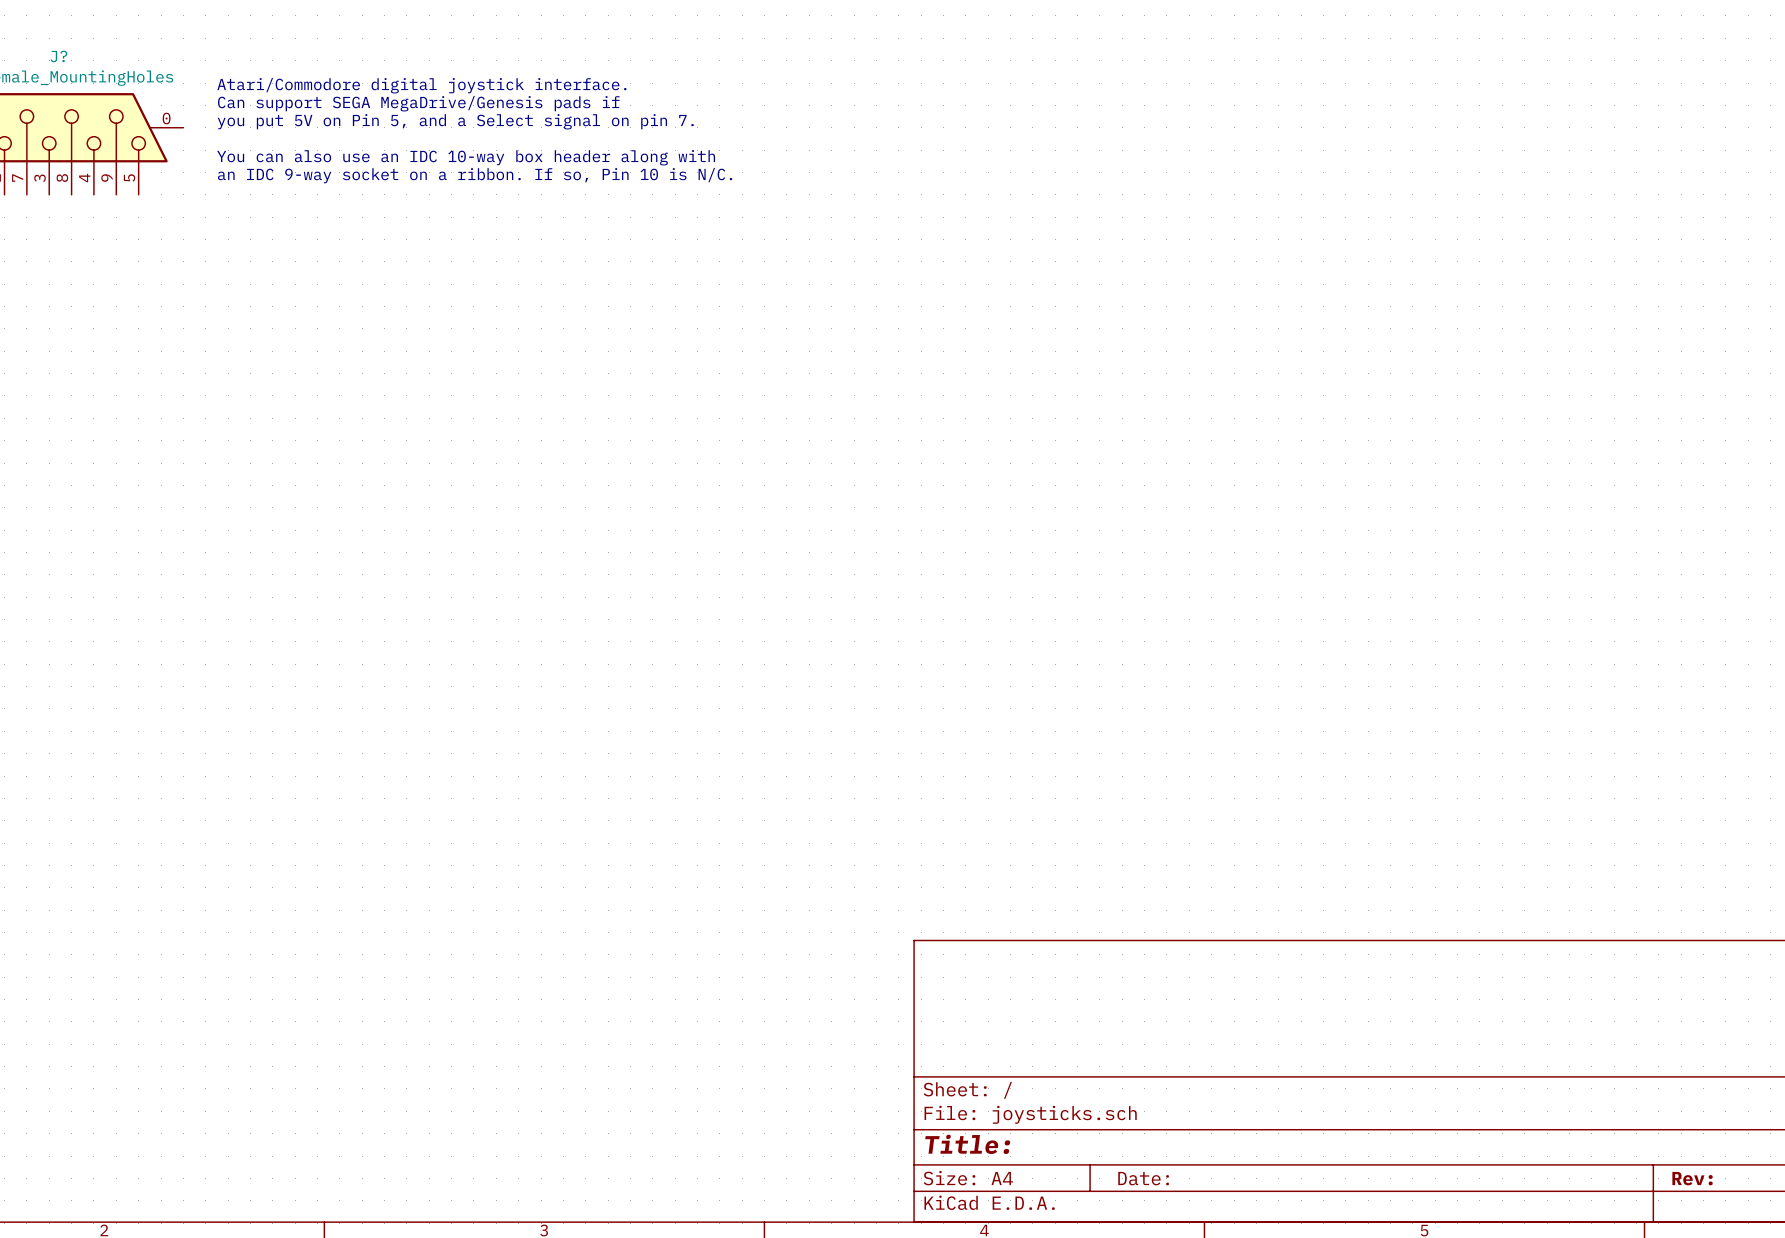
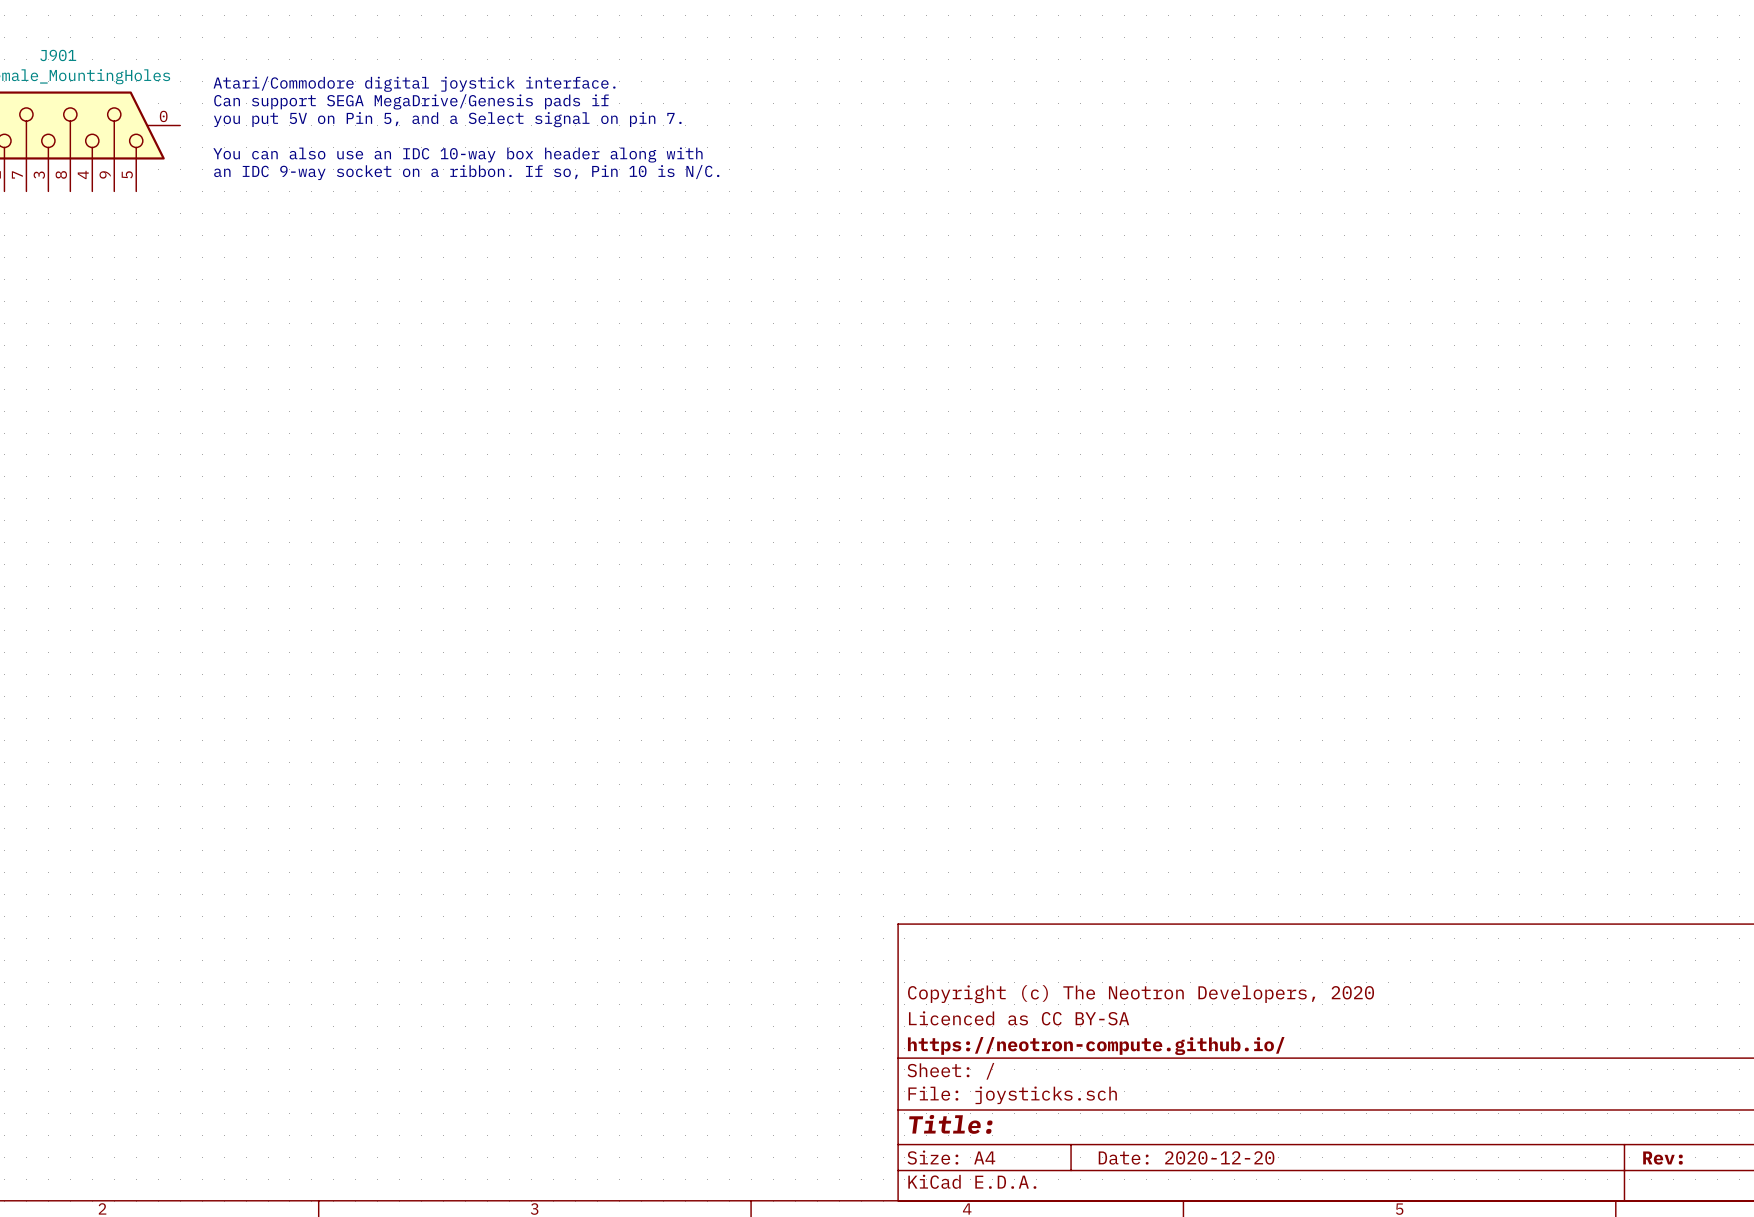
J? name: J? (58, 56) -> J901 (58, 55)
title block: none -> Copyright (c) The Neotron Developers, 2020 (1141, 994)
title block: none -> Licenced as CC BY-SA (1019, 1018)
title block: none -> https://neotron-compute.github.io/ (1096, 1046)
title block: Date: (1143, 1178) -> Date: 2020-12-20 (1186, 1157)

